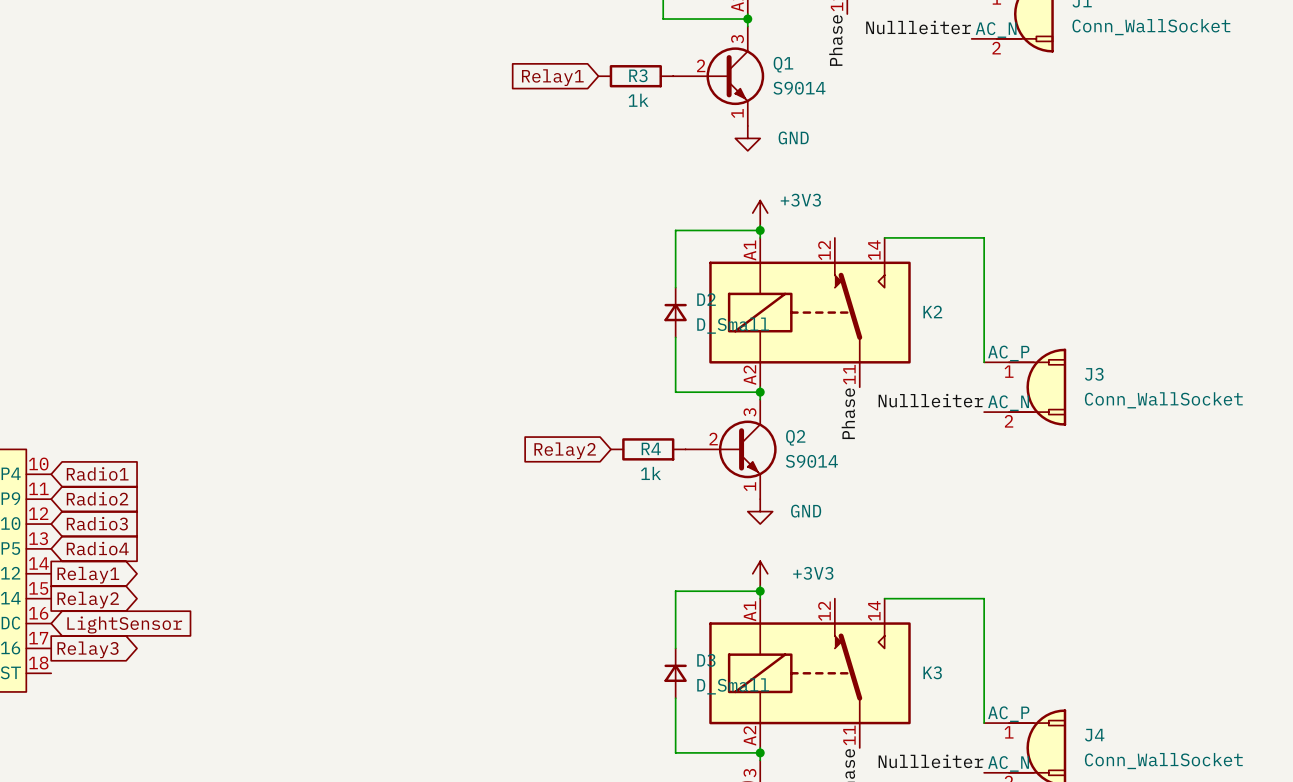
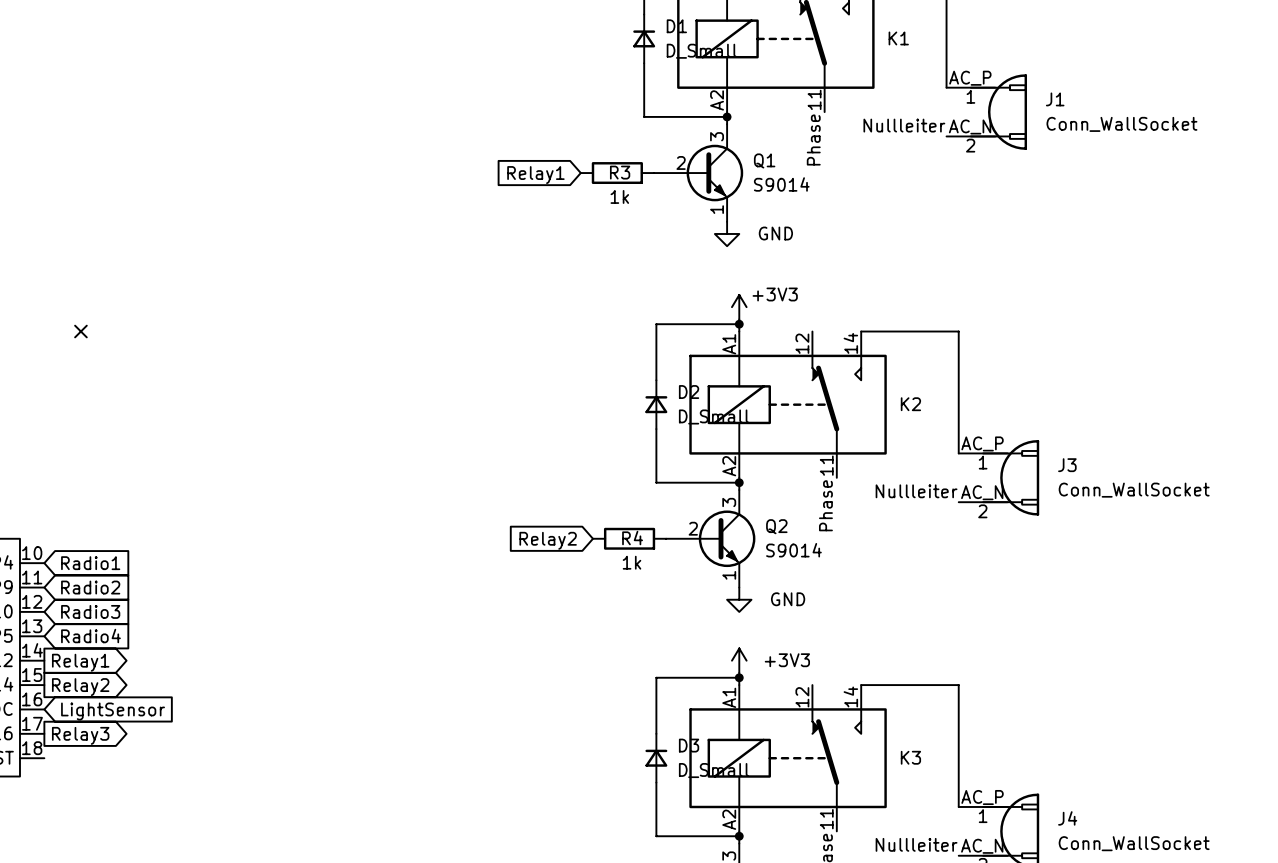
no-connect mark: none -> (80, 331)

